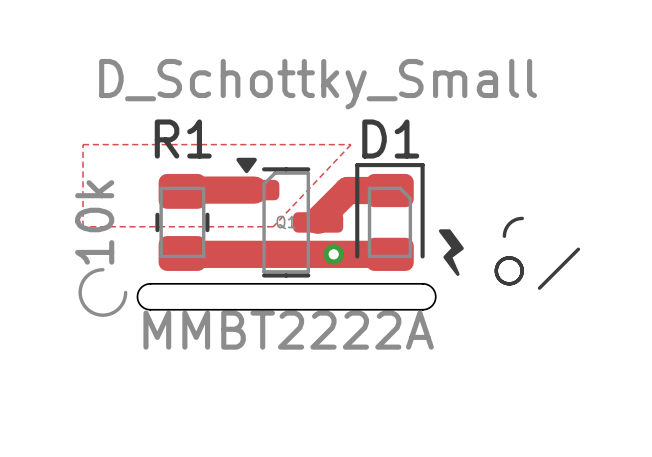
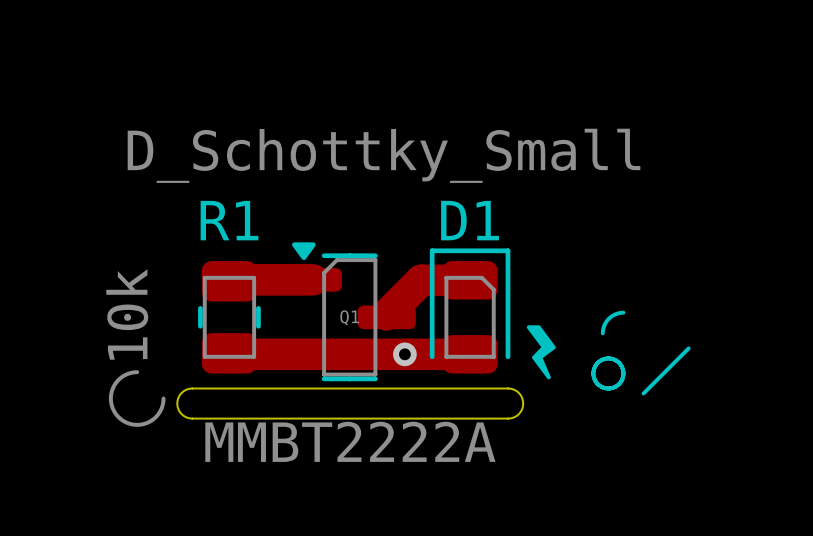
zone outline: (83, 144) (351, 144) (273, 226) (83, 226) (83, 144) -> none

